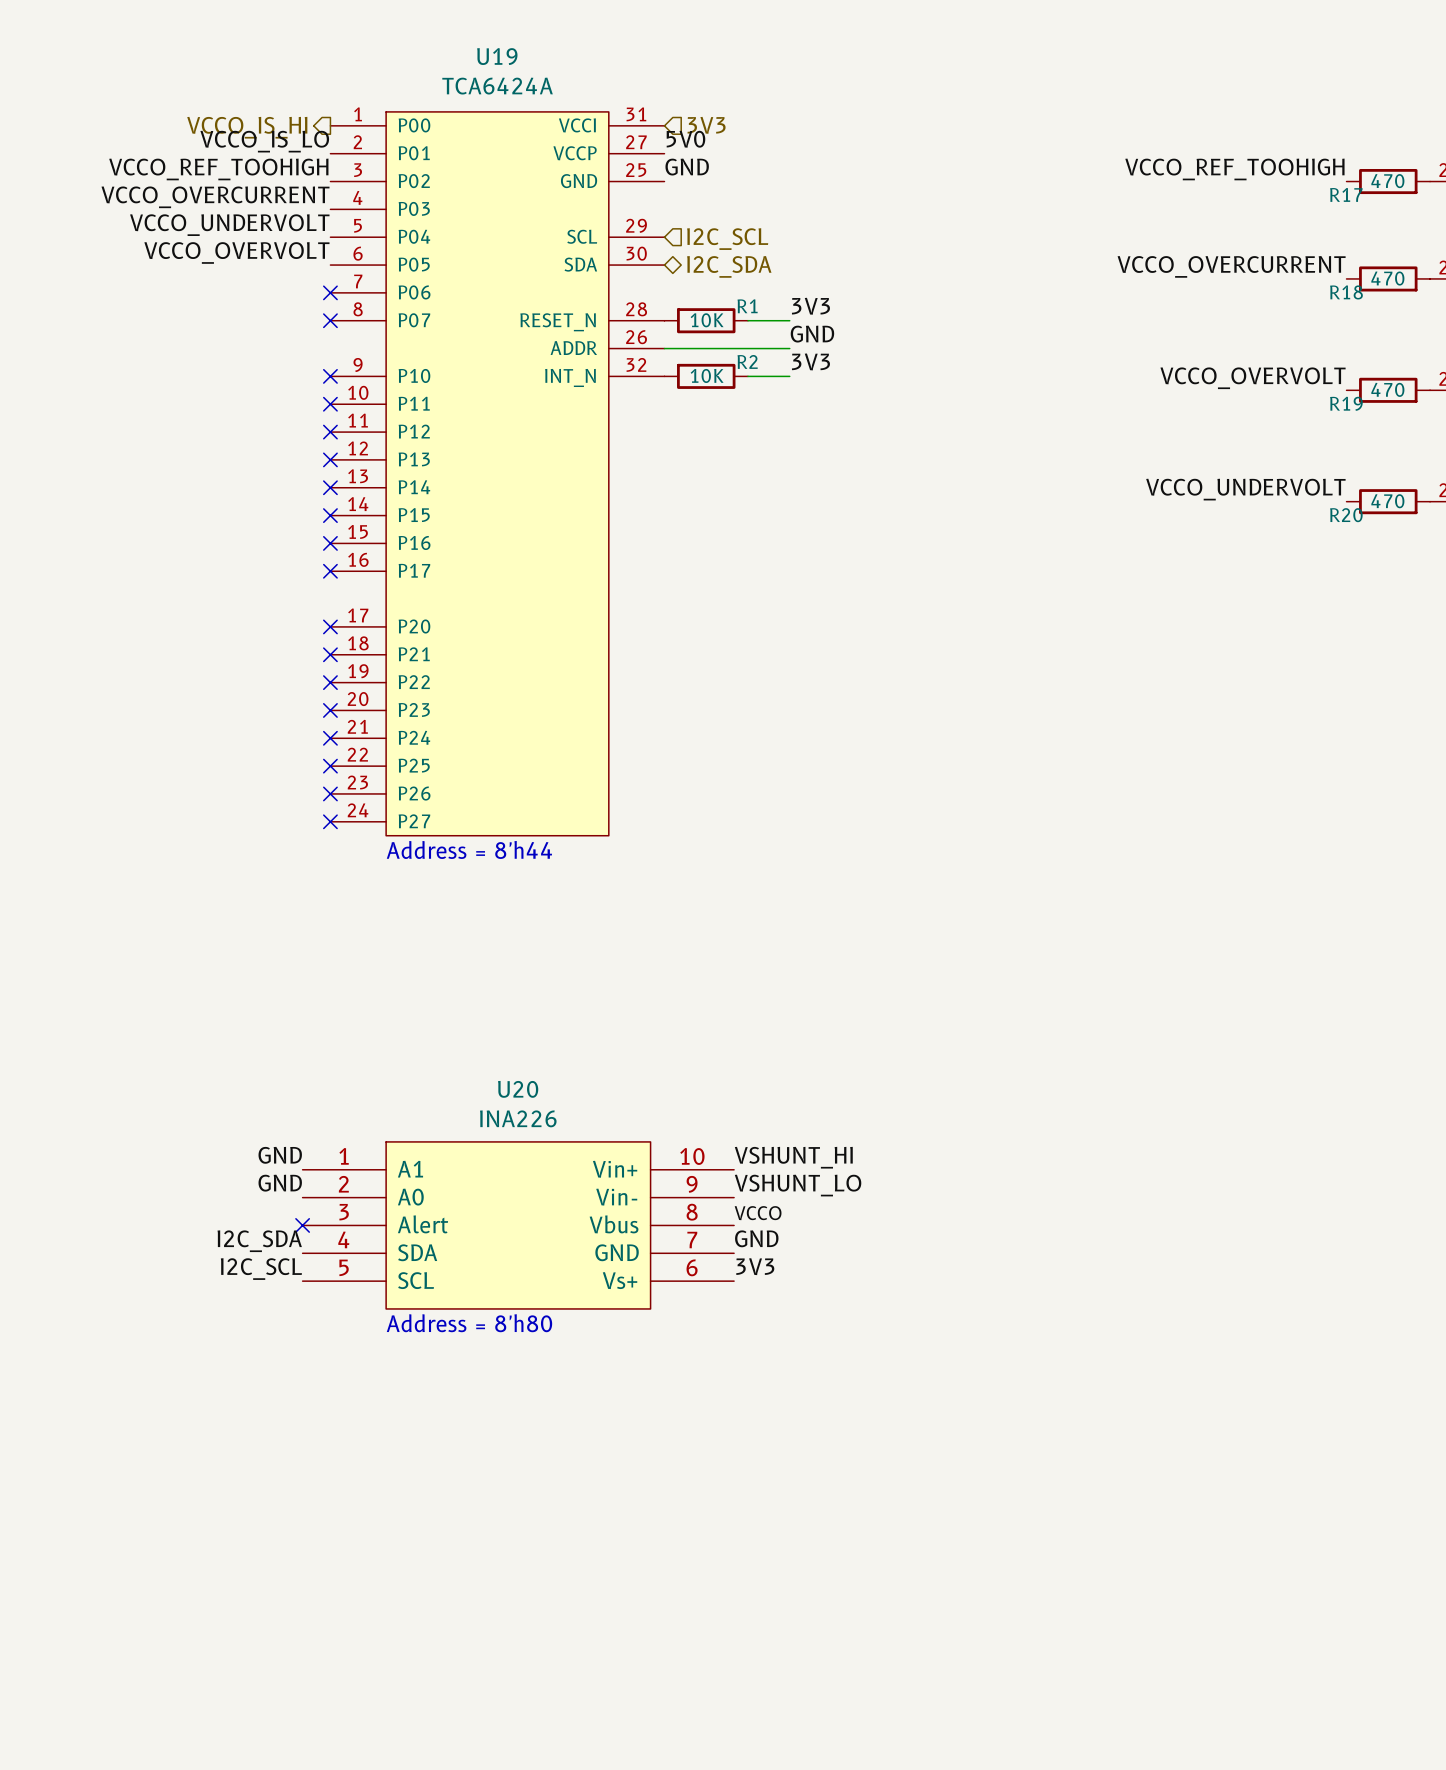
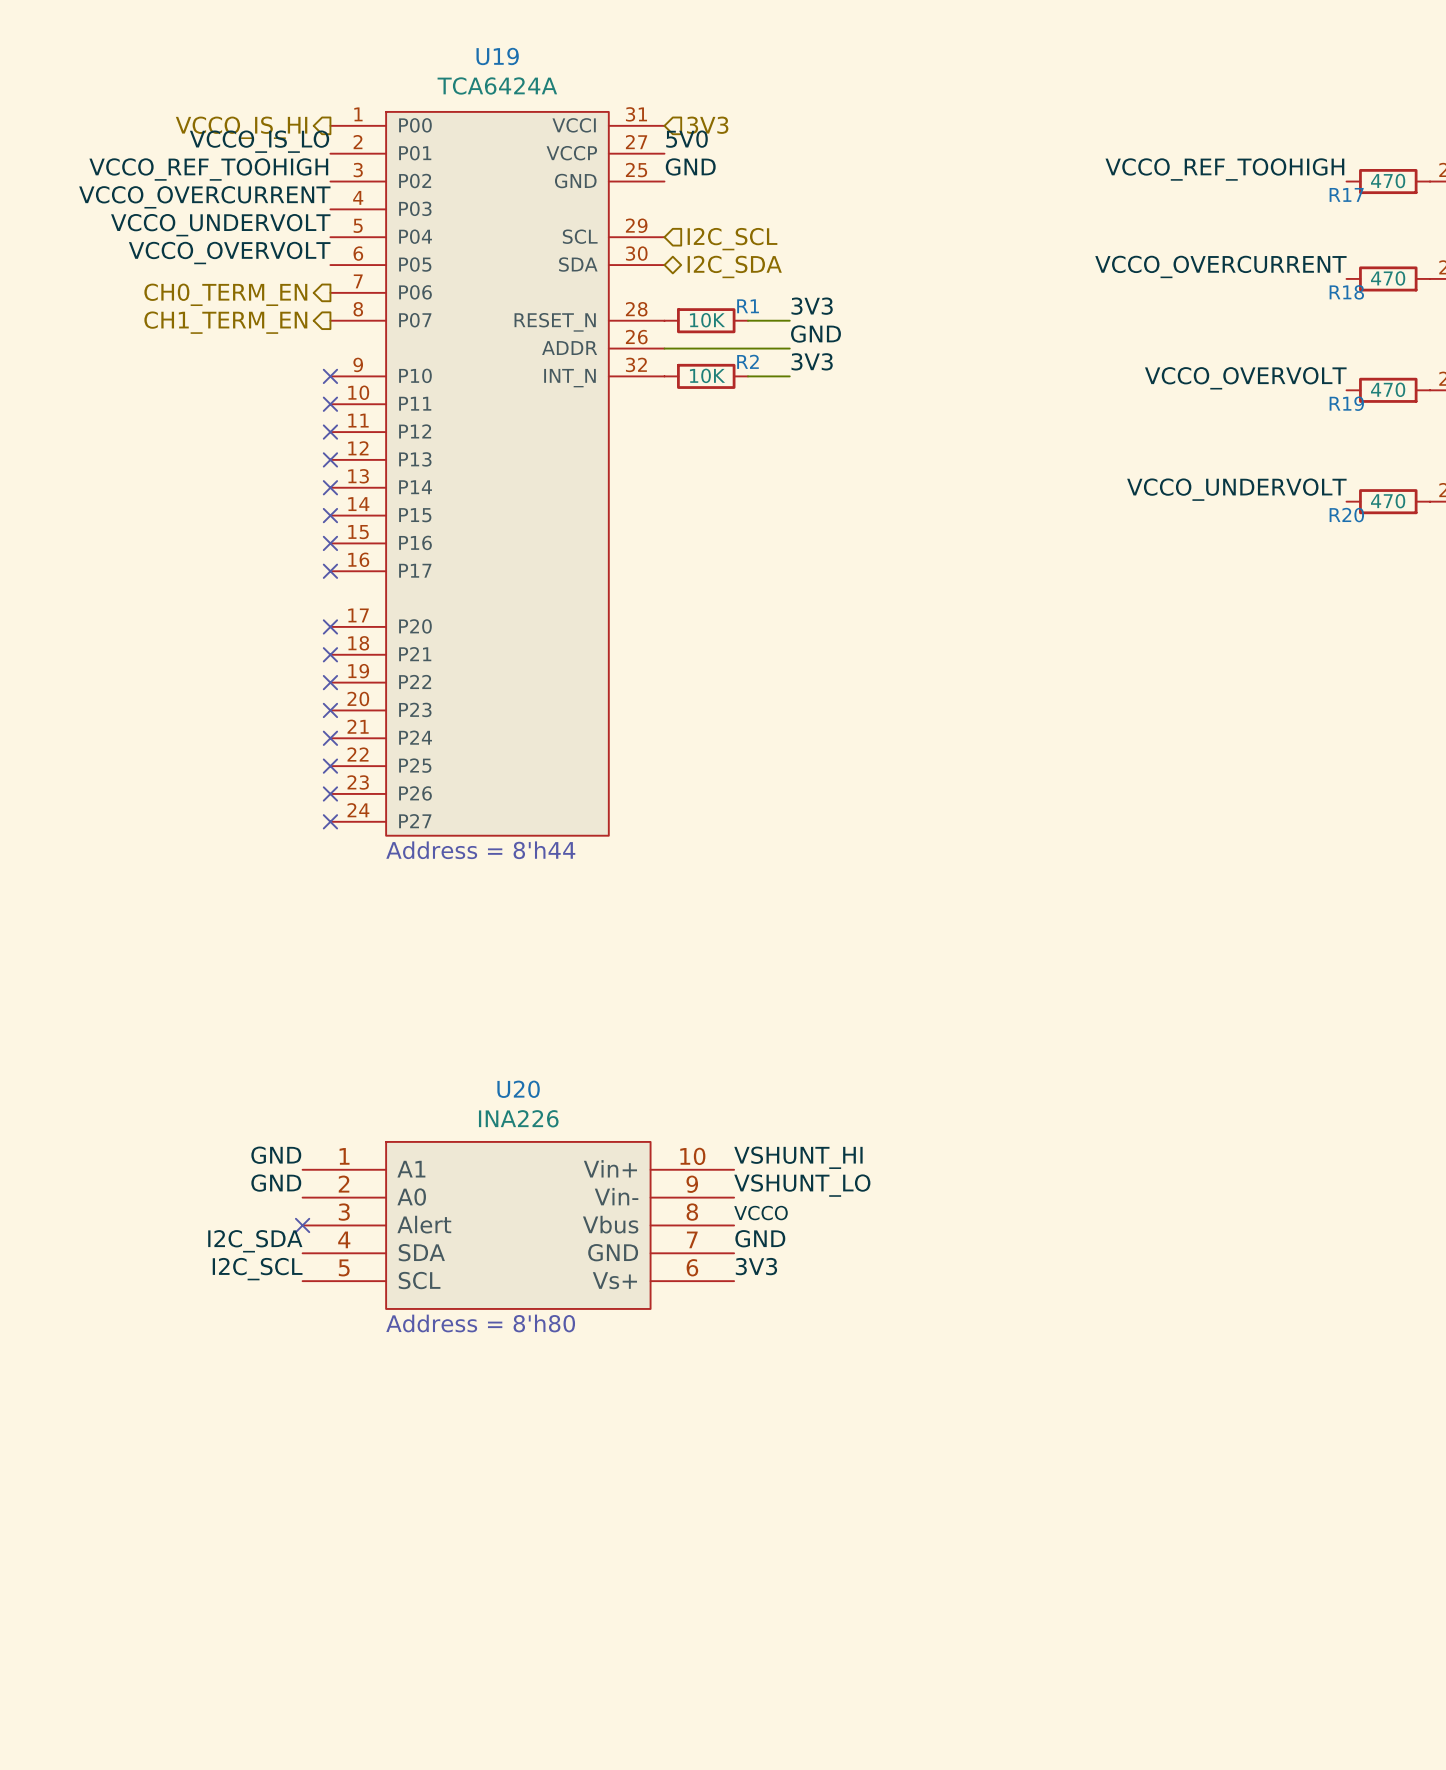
no-connect mark: (330, 292) -> none
hierarchical label: none -> CH0_TERM_EN (225, 294)
no-connect mark: (330, 320) -> none
hierarchical label: none -> CH1_TERM_EN (225, 322)

